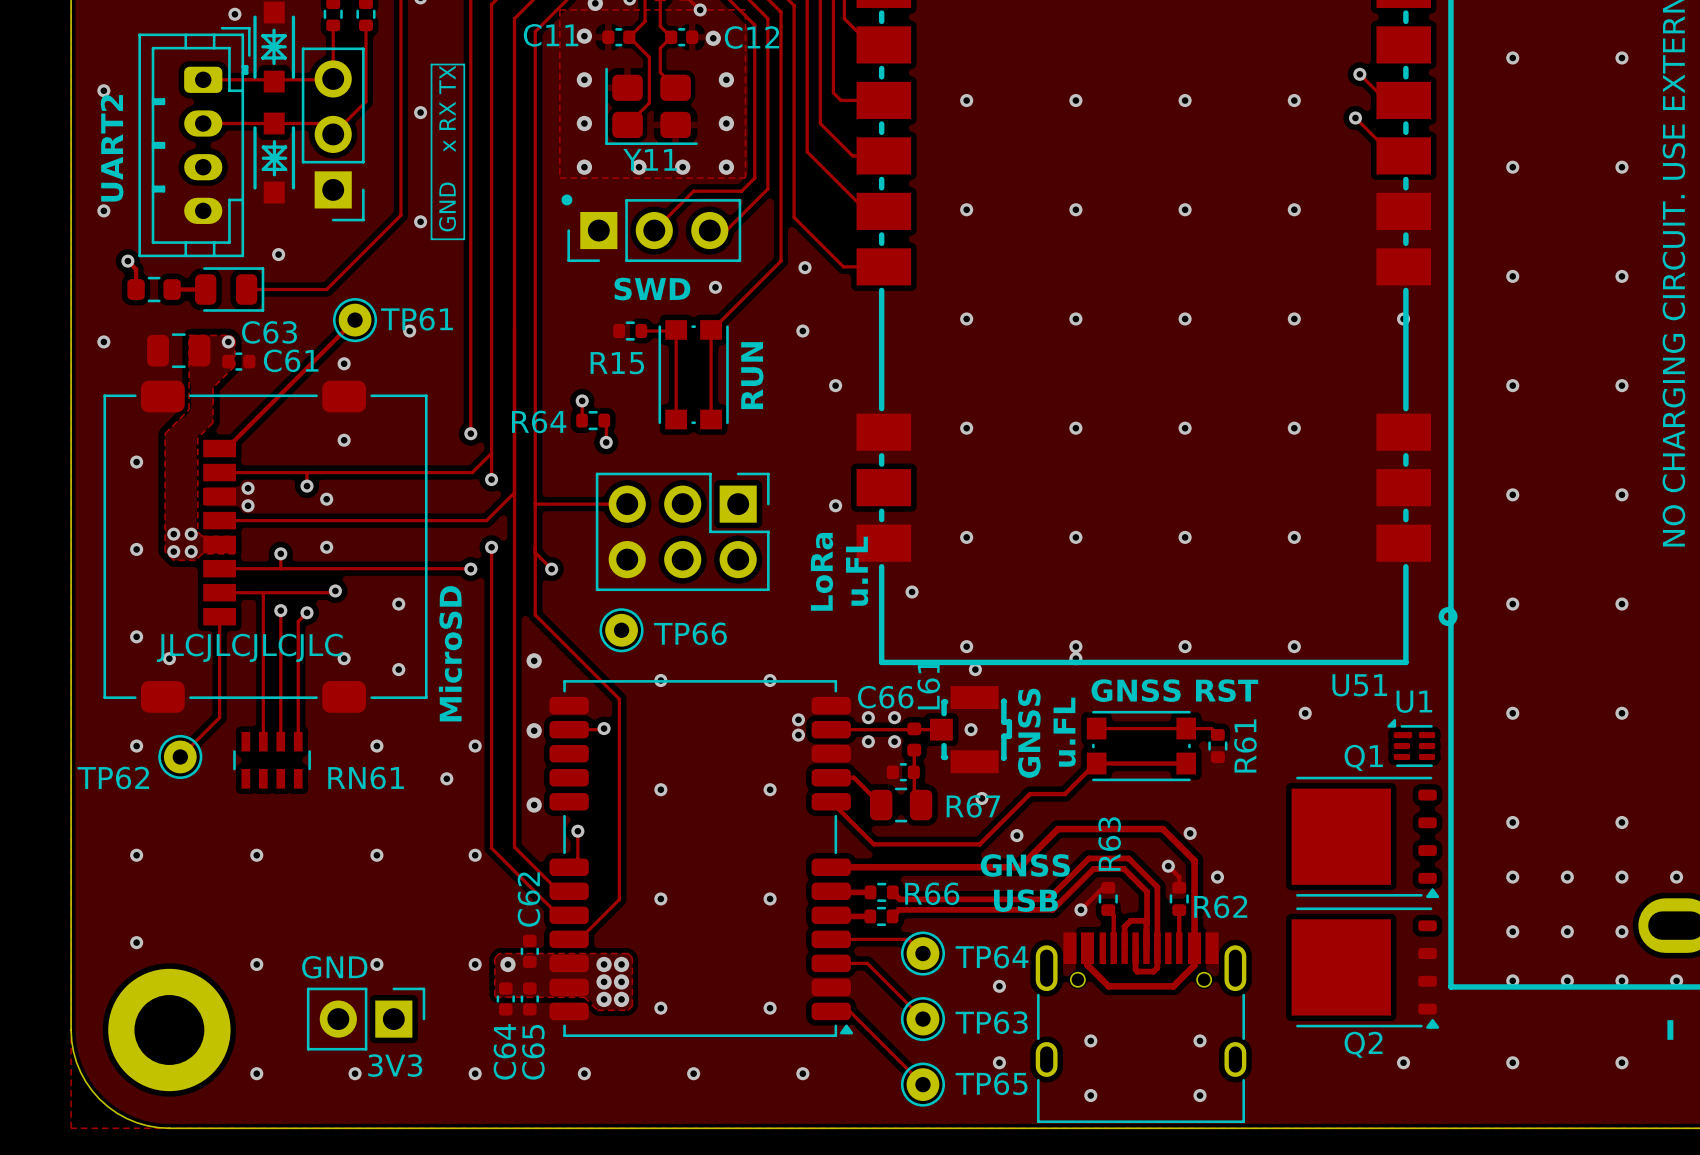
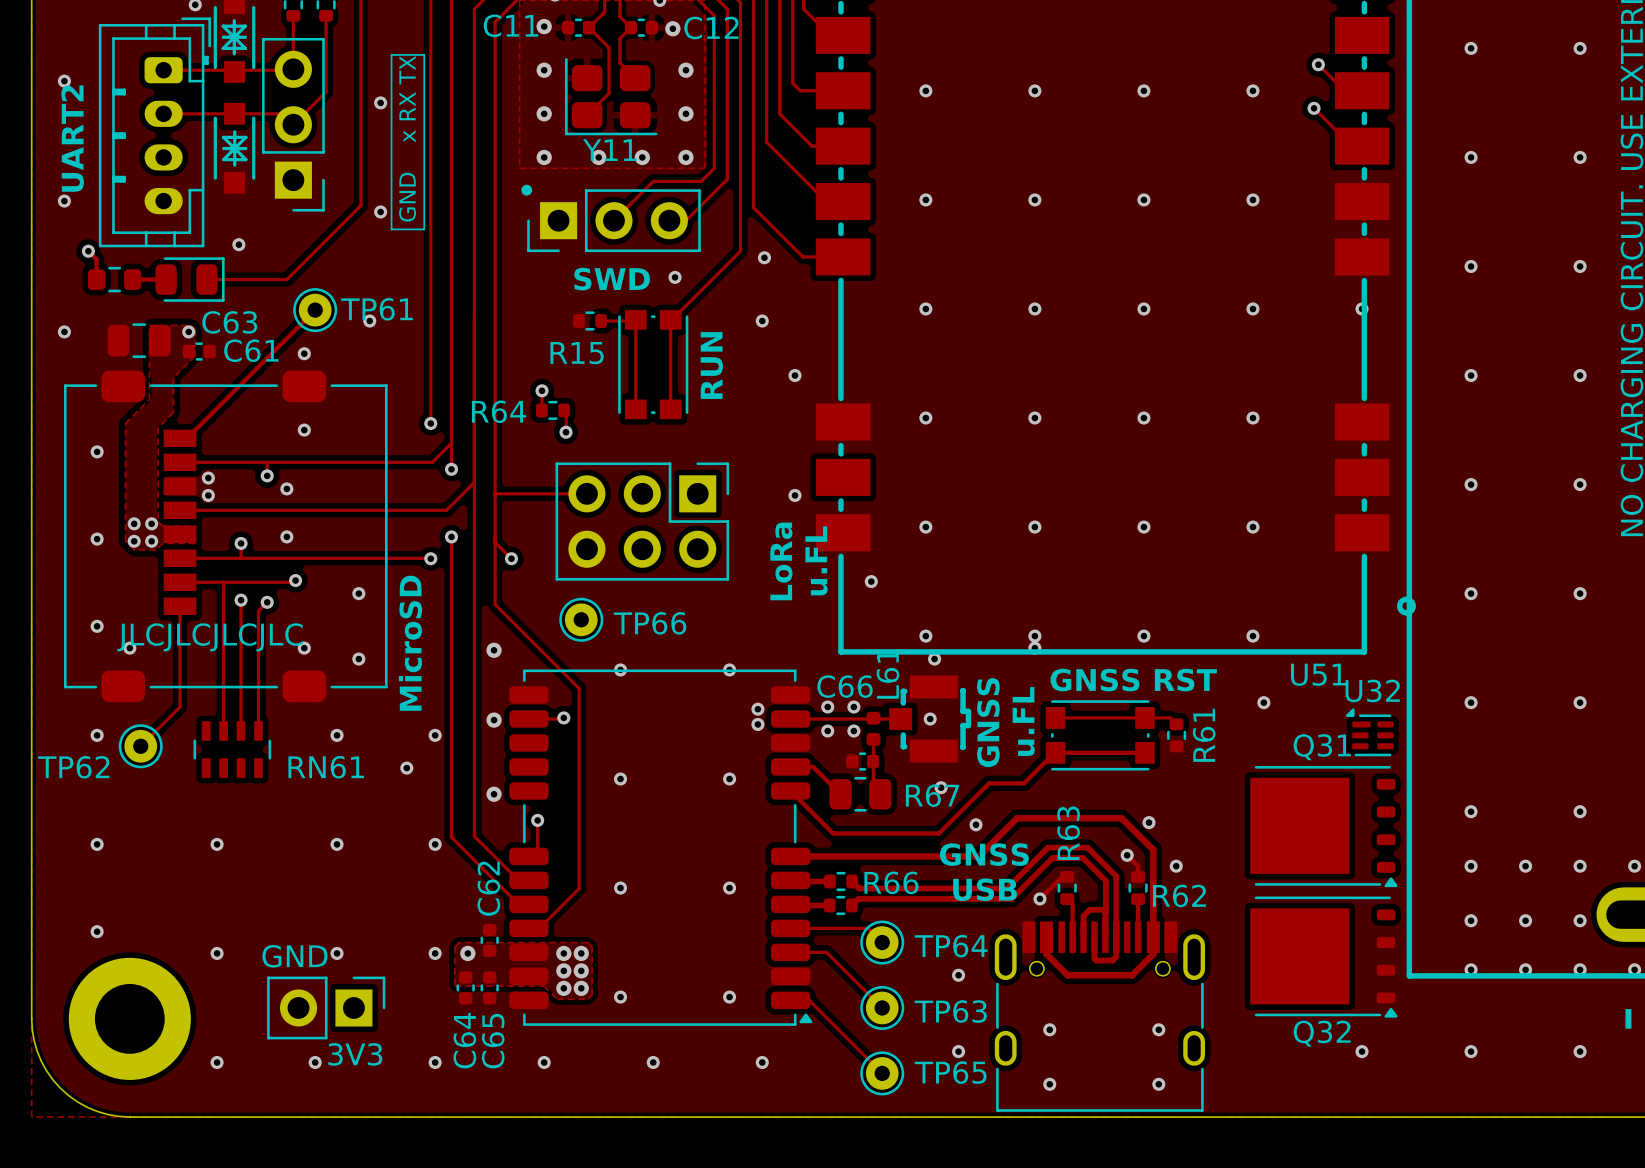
U1 name: U1 (1414, 701) -> U32 (1372, 690)
Q1 name: Q1 (1363, 757) -> Q31 (1322, 747)
Q2 name: Q2 (1363, 1044) -> Q32 (1322, 1033)

